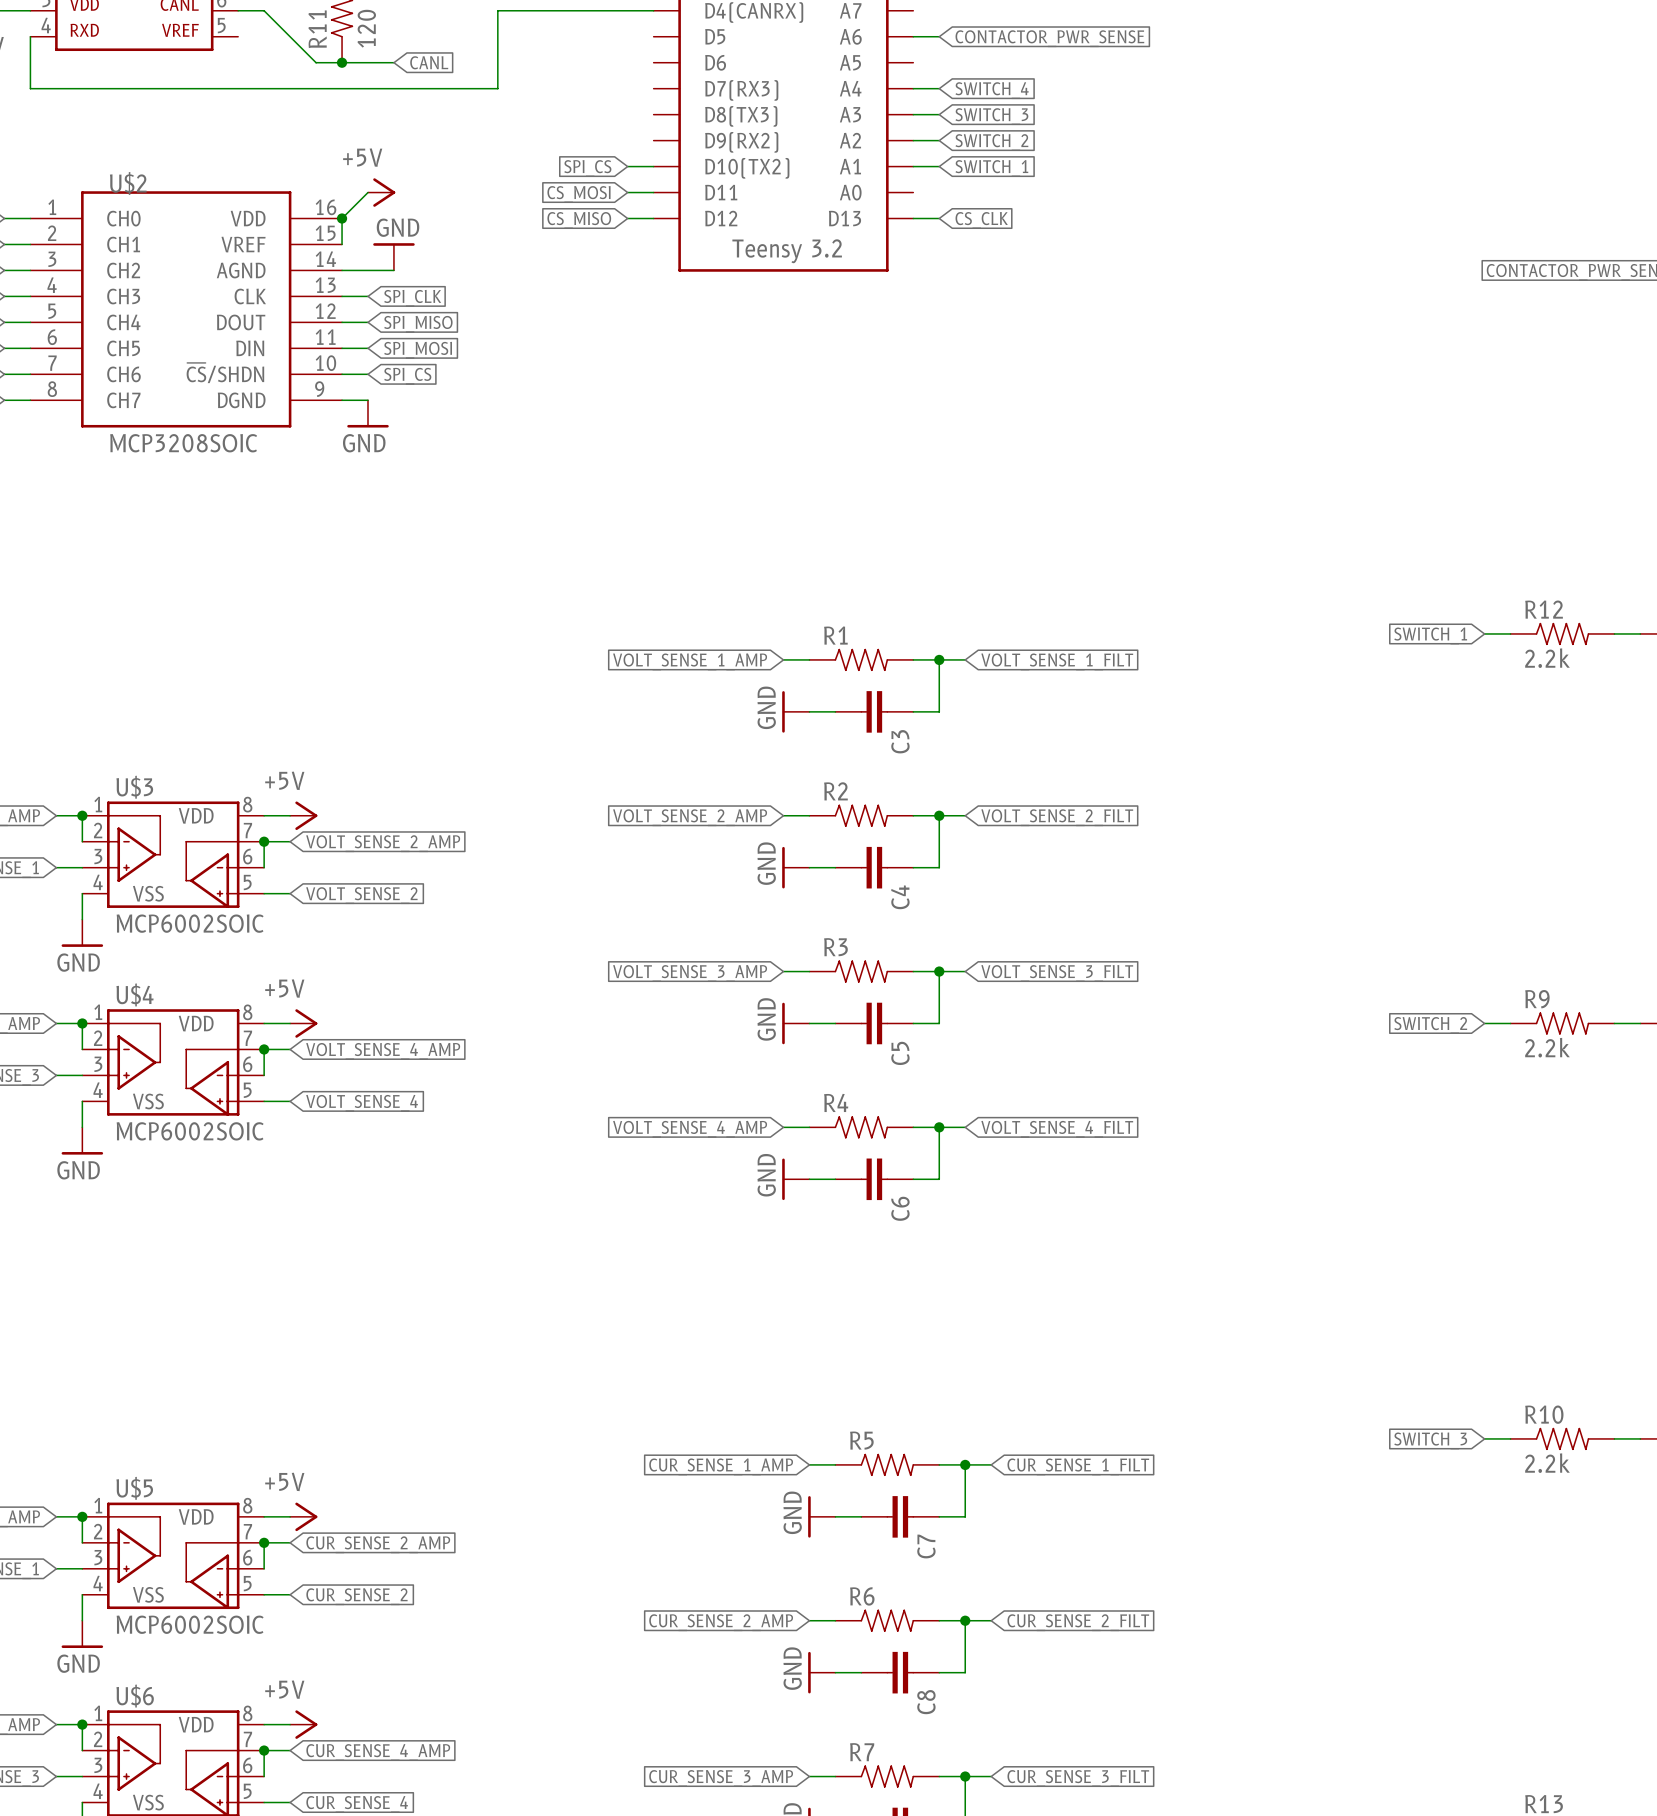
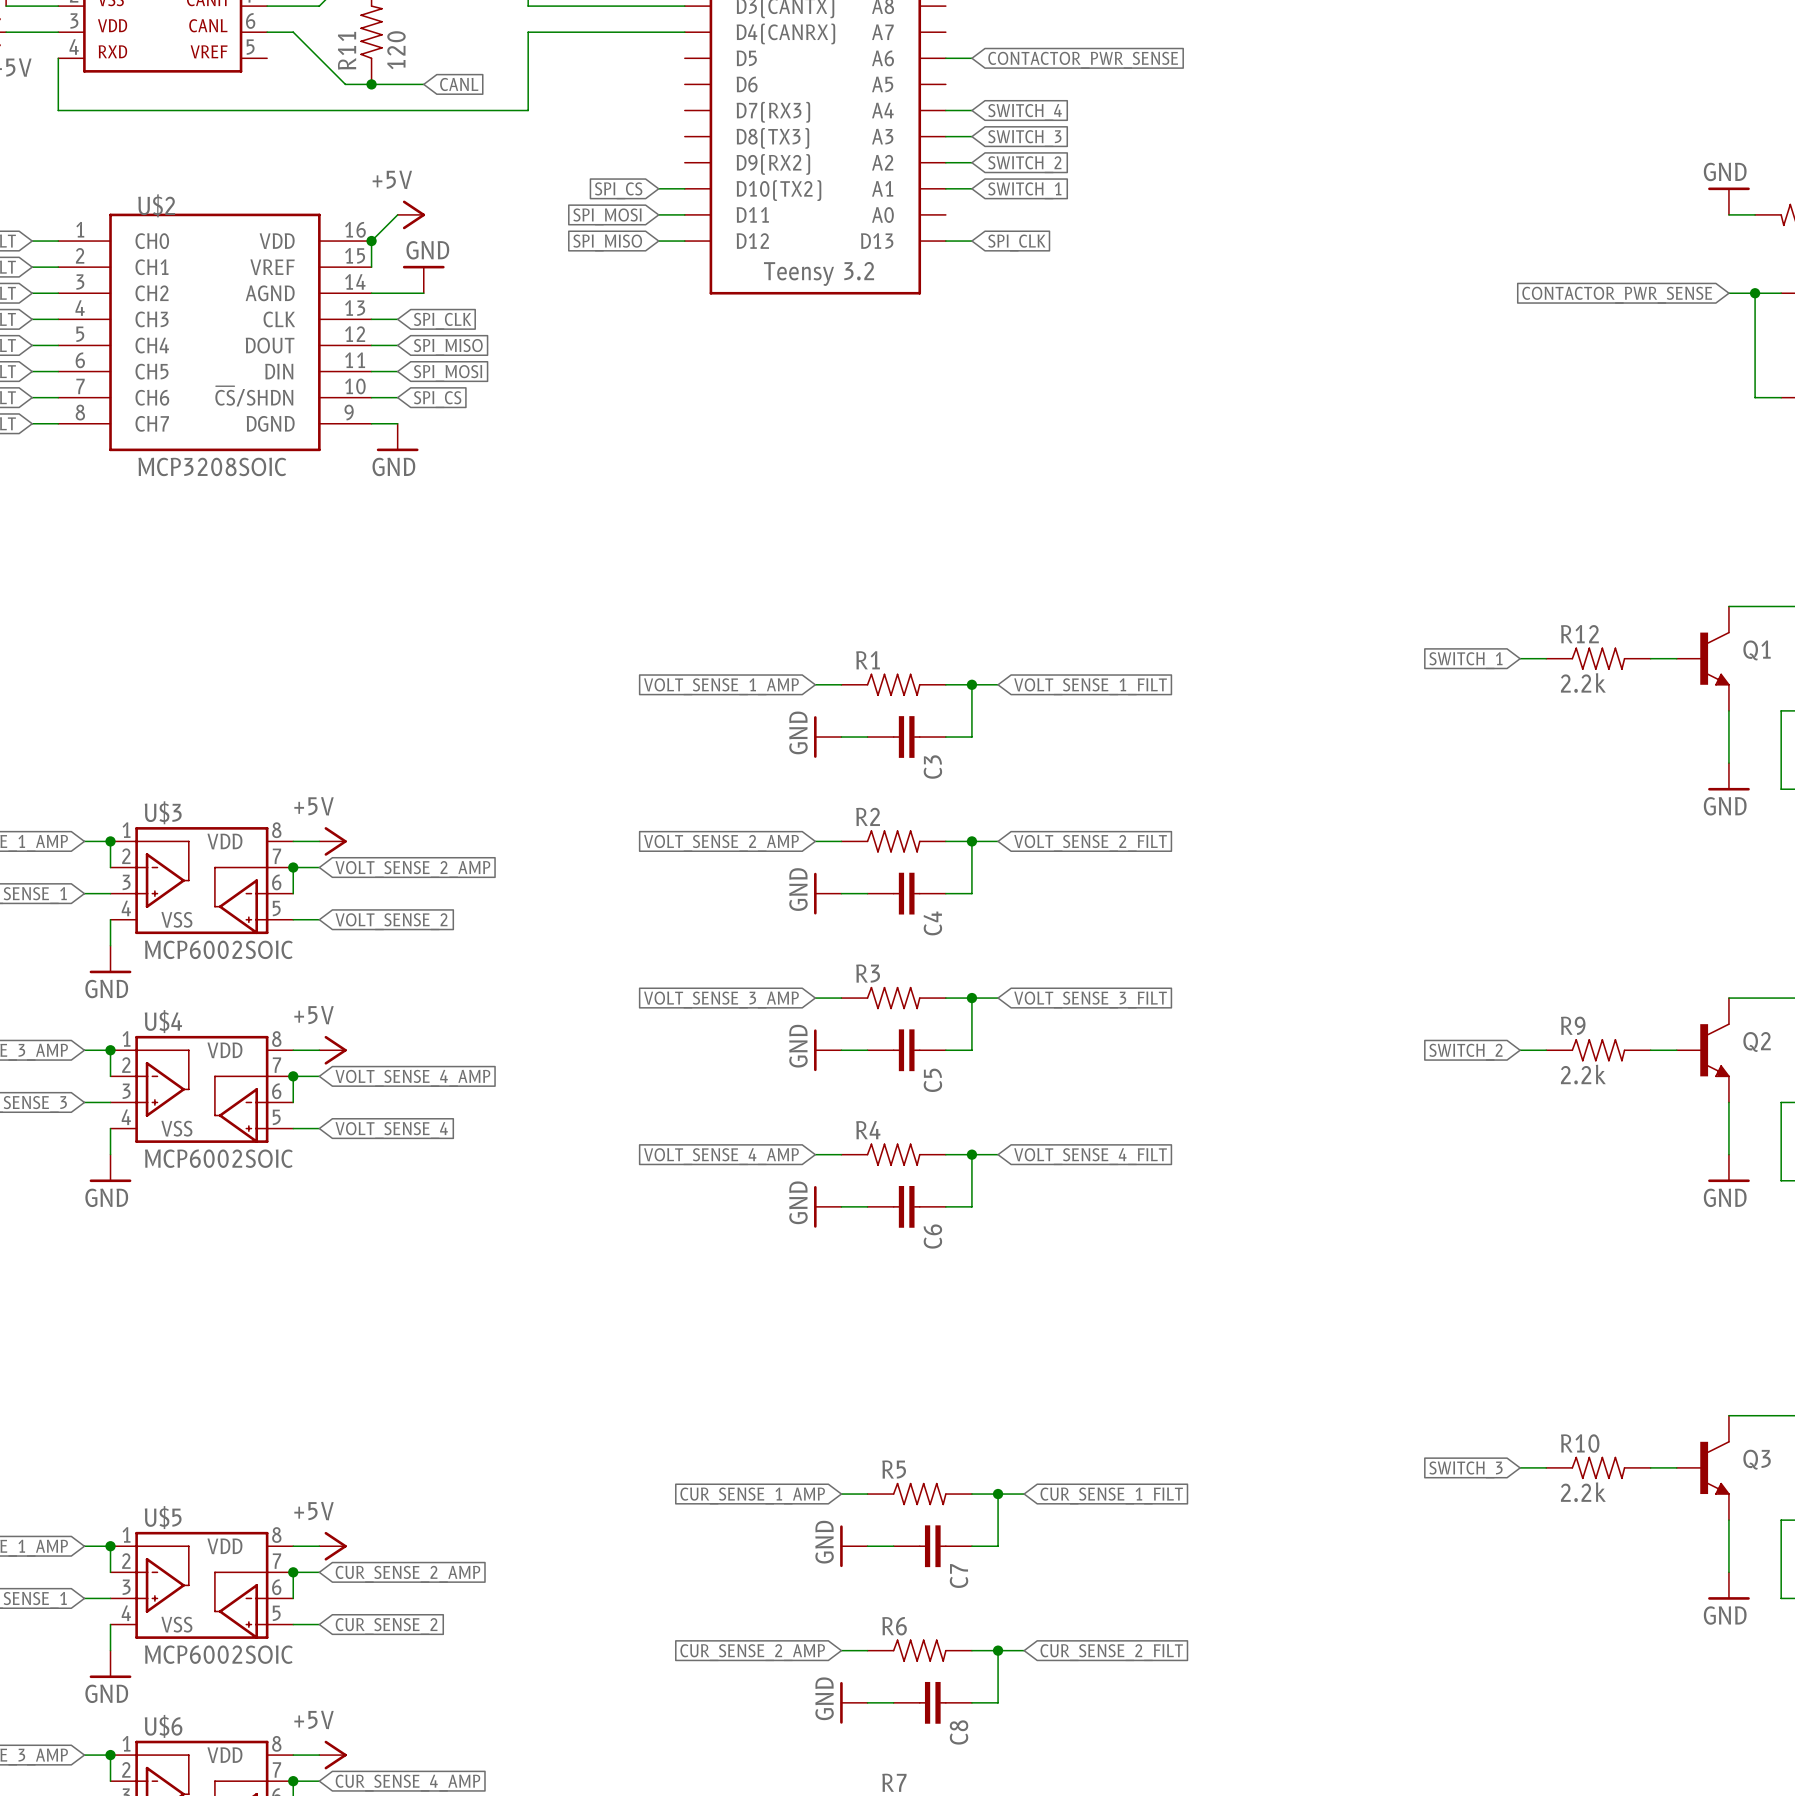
global label: CS_MOSI (578, 194) -> SPI_MOSI (607, 216)
global label: CS_MISO (579, 220) -> SPI_MISO (607, 242)
global label: CS_CLK (981, 220) -> SPI_CLK (1016, 242)

